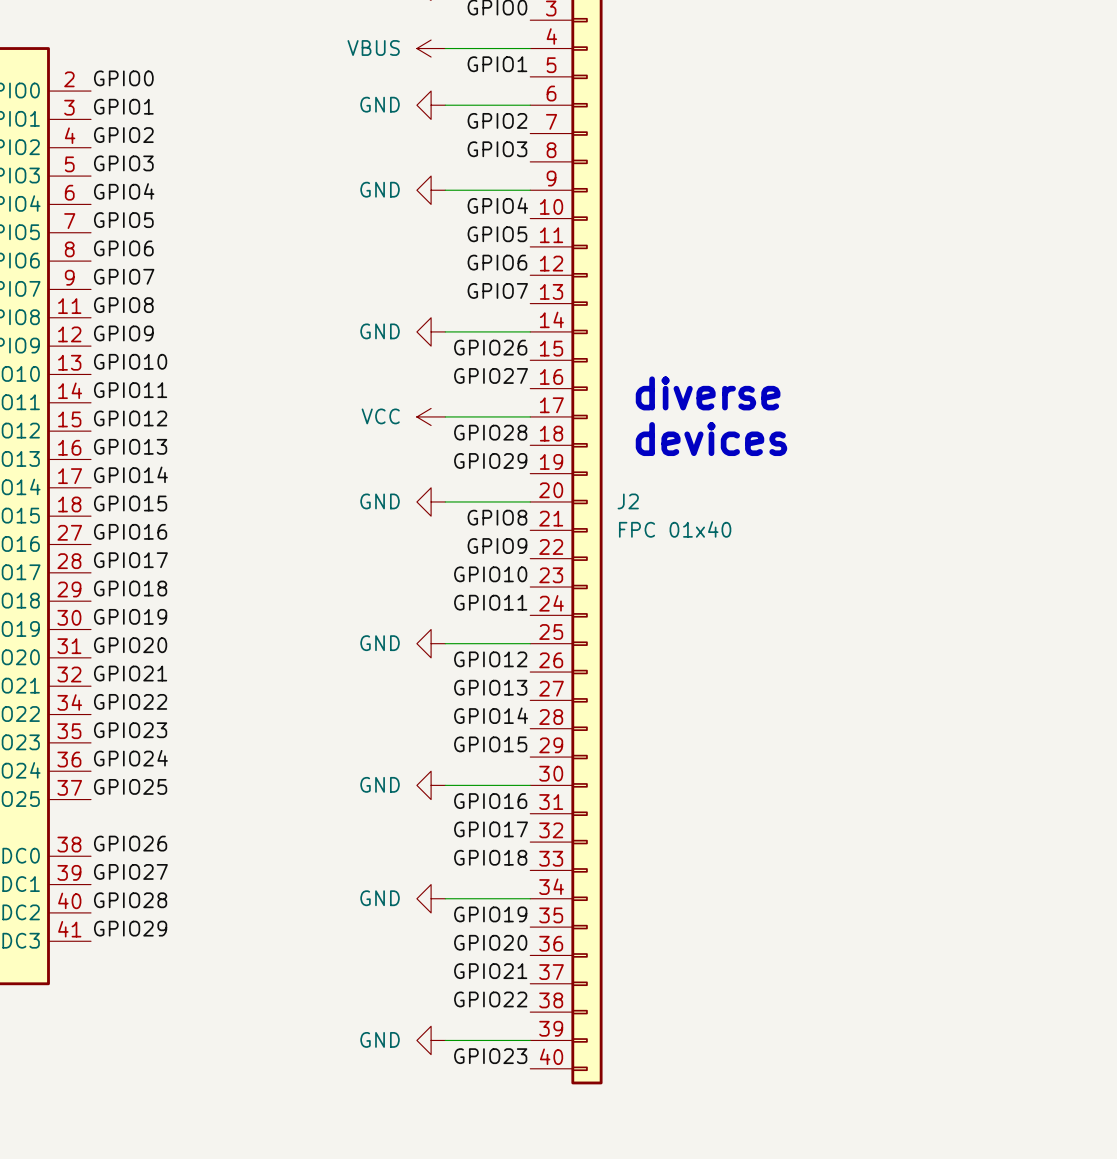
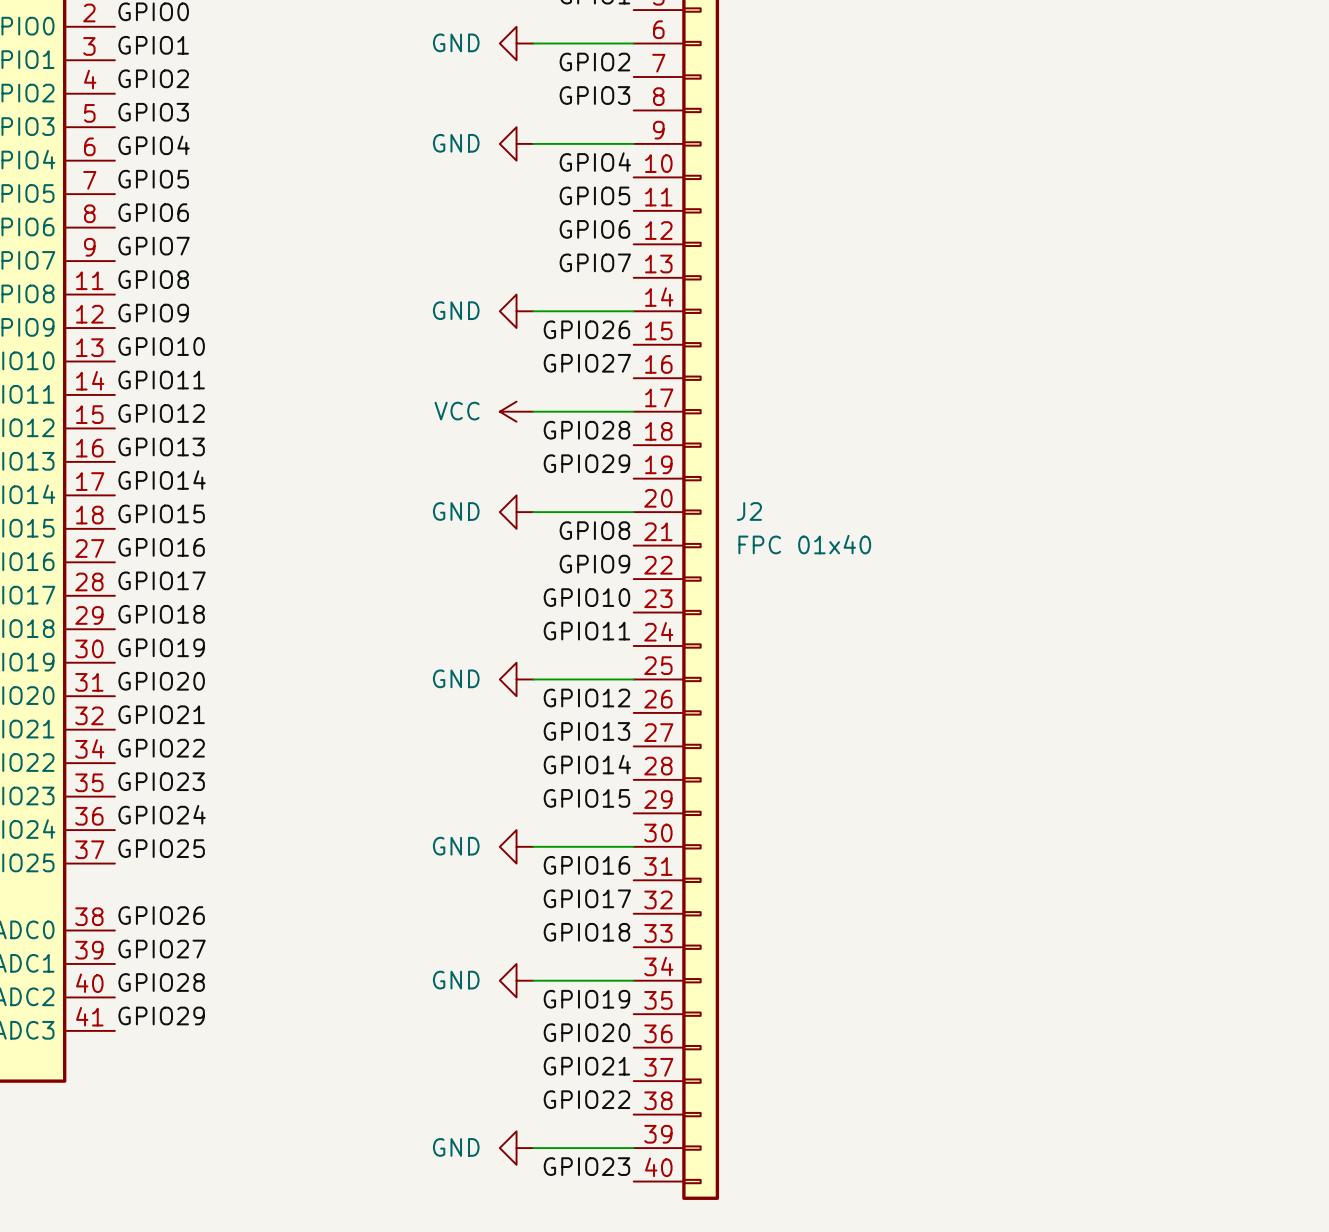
text: diverse (708, 393) -> none
text: devices (711, 439) -> none

